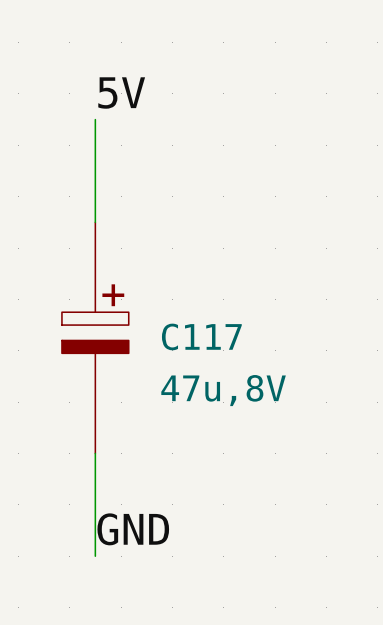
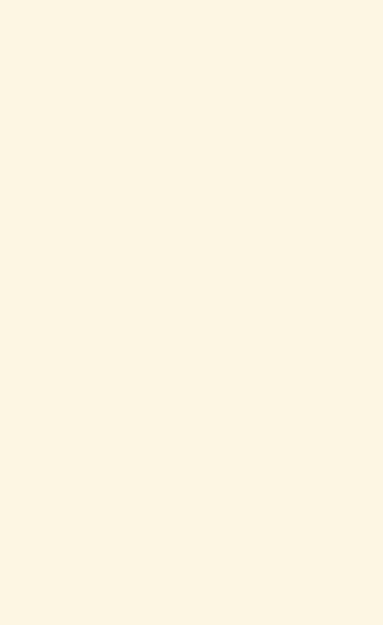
label: 5V (121, 93) -> none
wire: (95, 119) (95, 222) -> none
C117: 47u,8V (95, 337) -> none
wire: (95, 453) (95, 556) -> none
label: GND (133, 529) -> none

